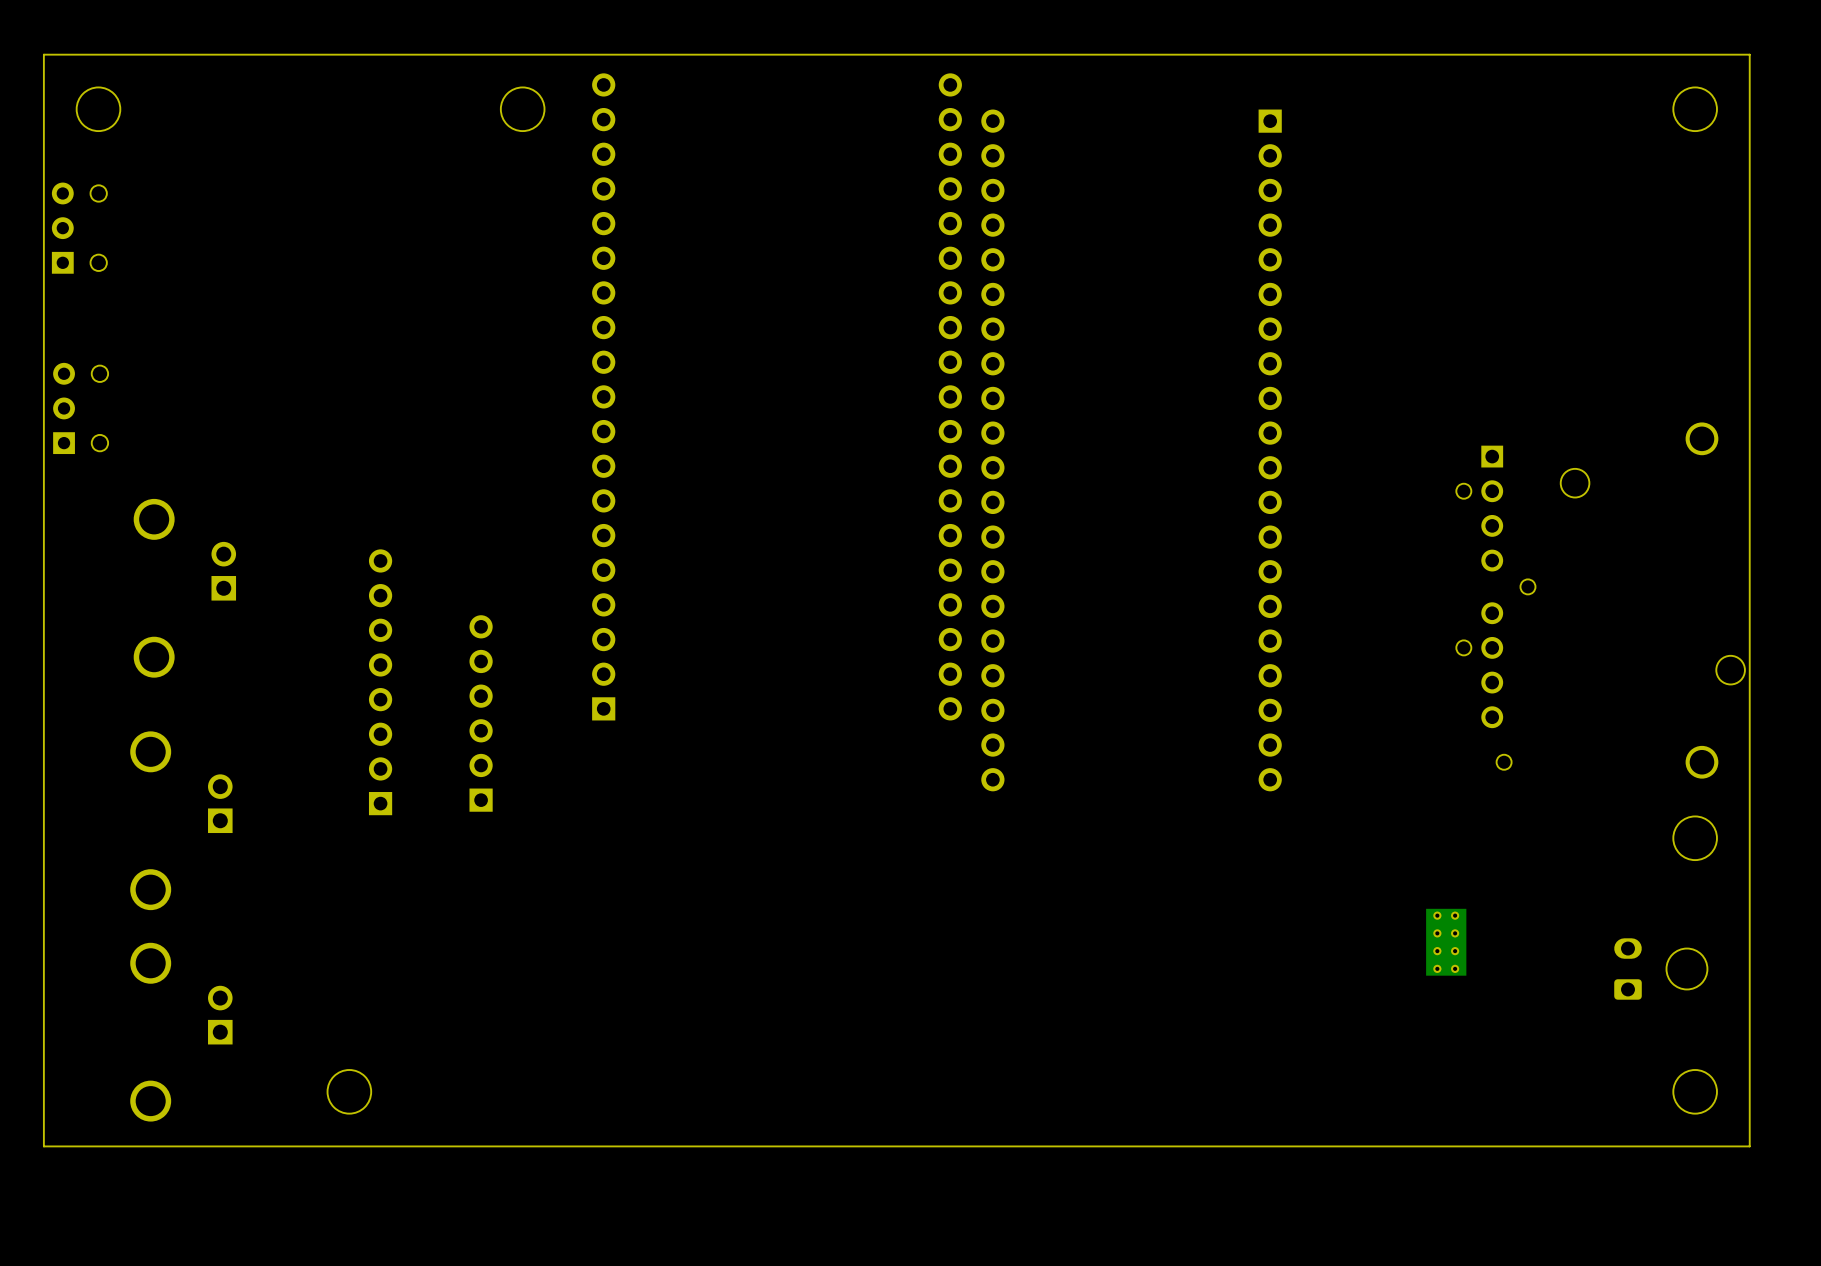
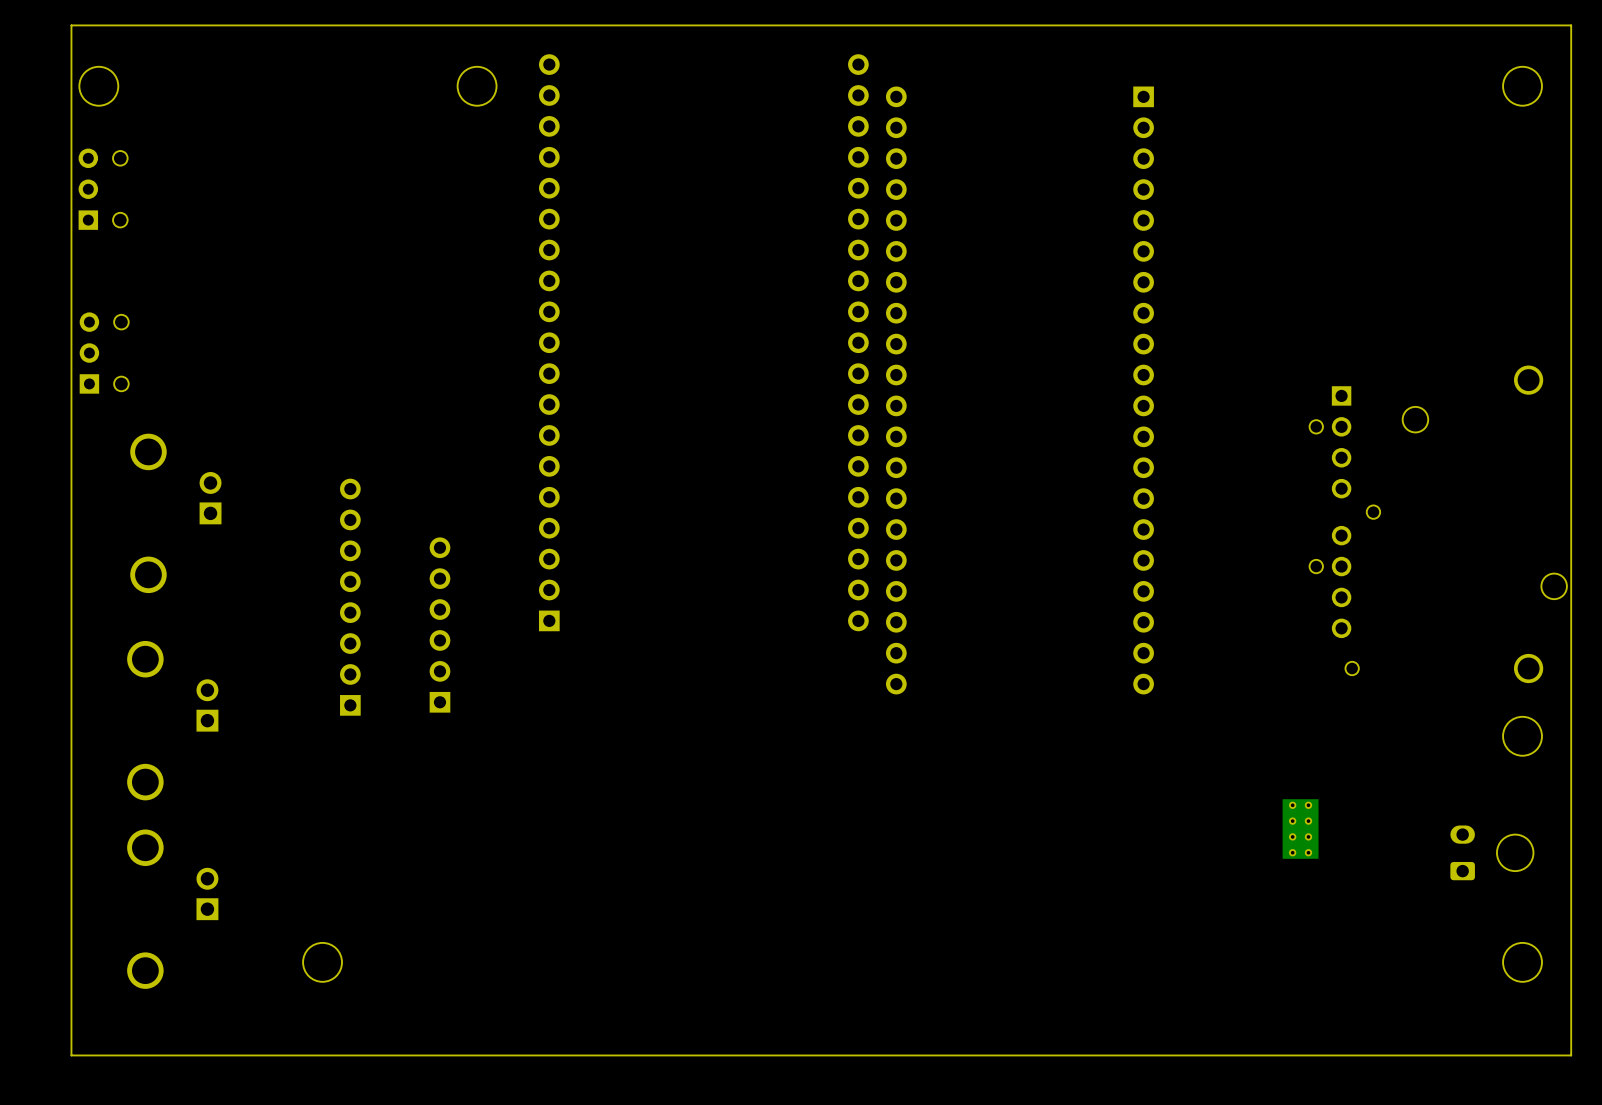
board edge: (1749, 54) (43, 54) (43, 1146) (1749, 1146) -> (1571, 37) (1571, 25) (71, 25) (71, 1055) (1571, 1055) (1571, 1011)
part position: (79, 228) -> (103, 189)
part position: (80, 408) -> (104, 353)

